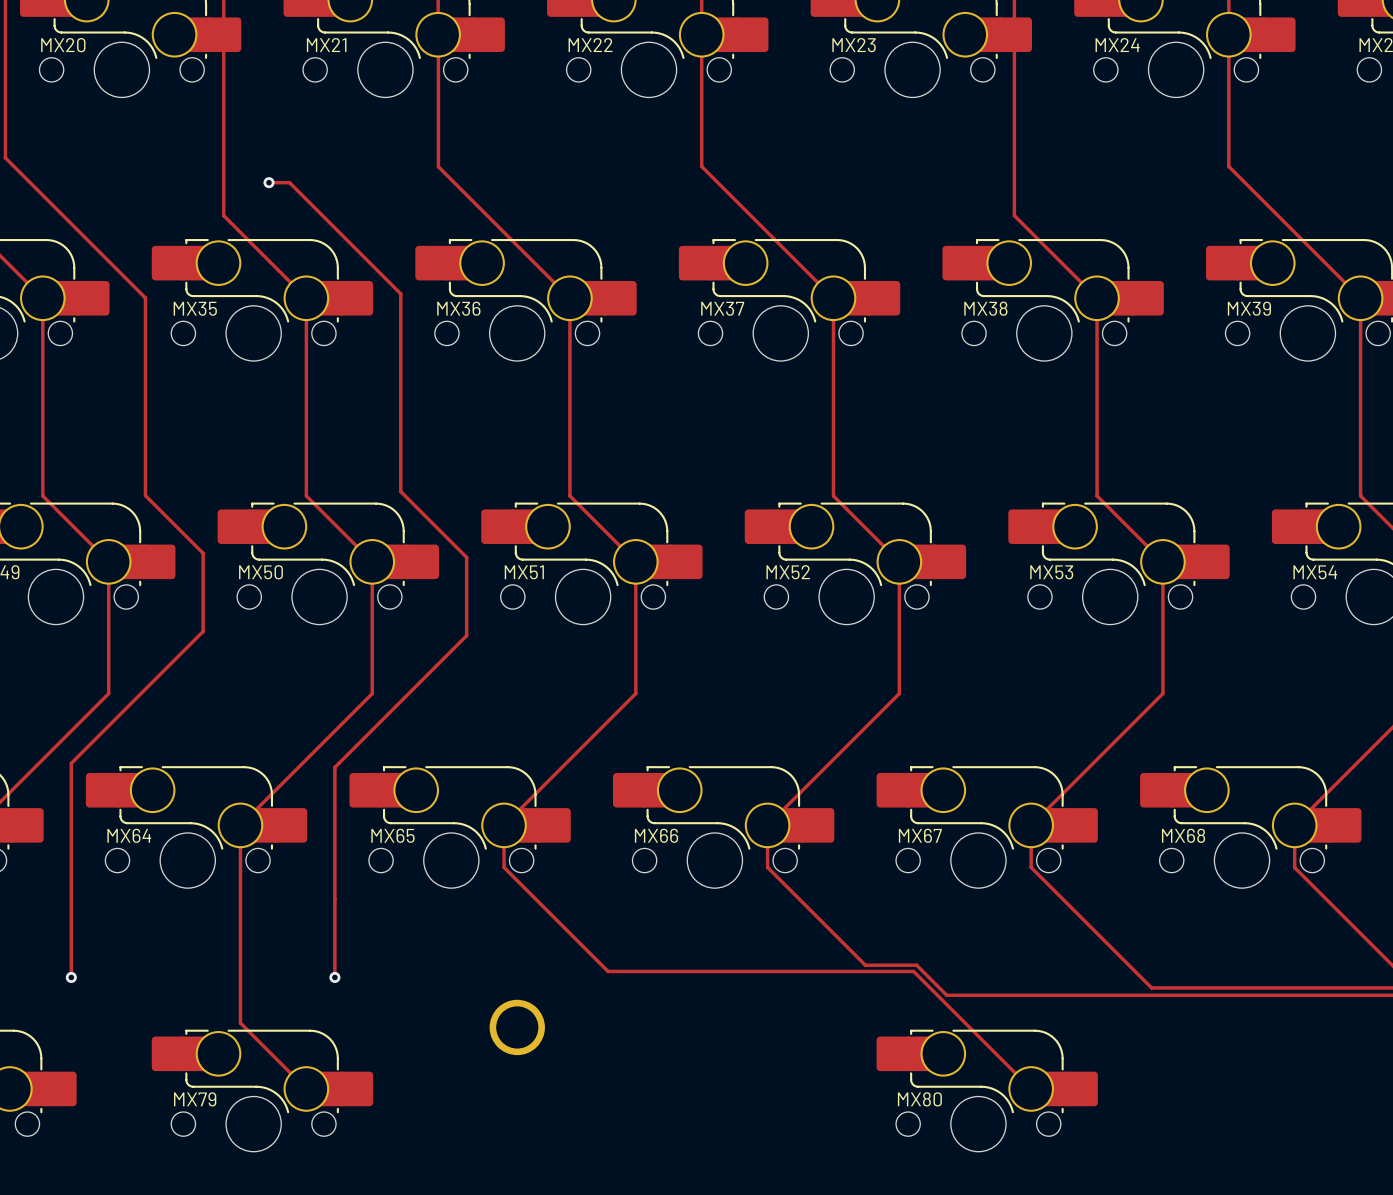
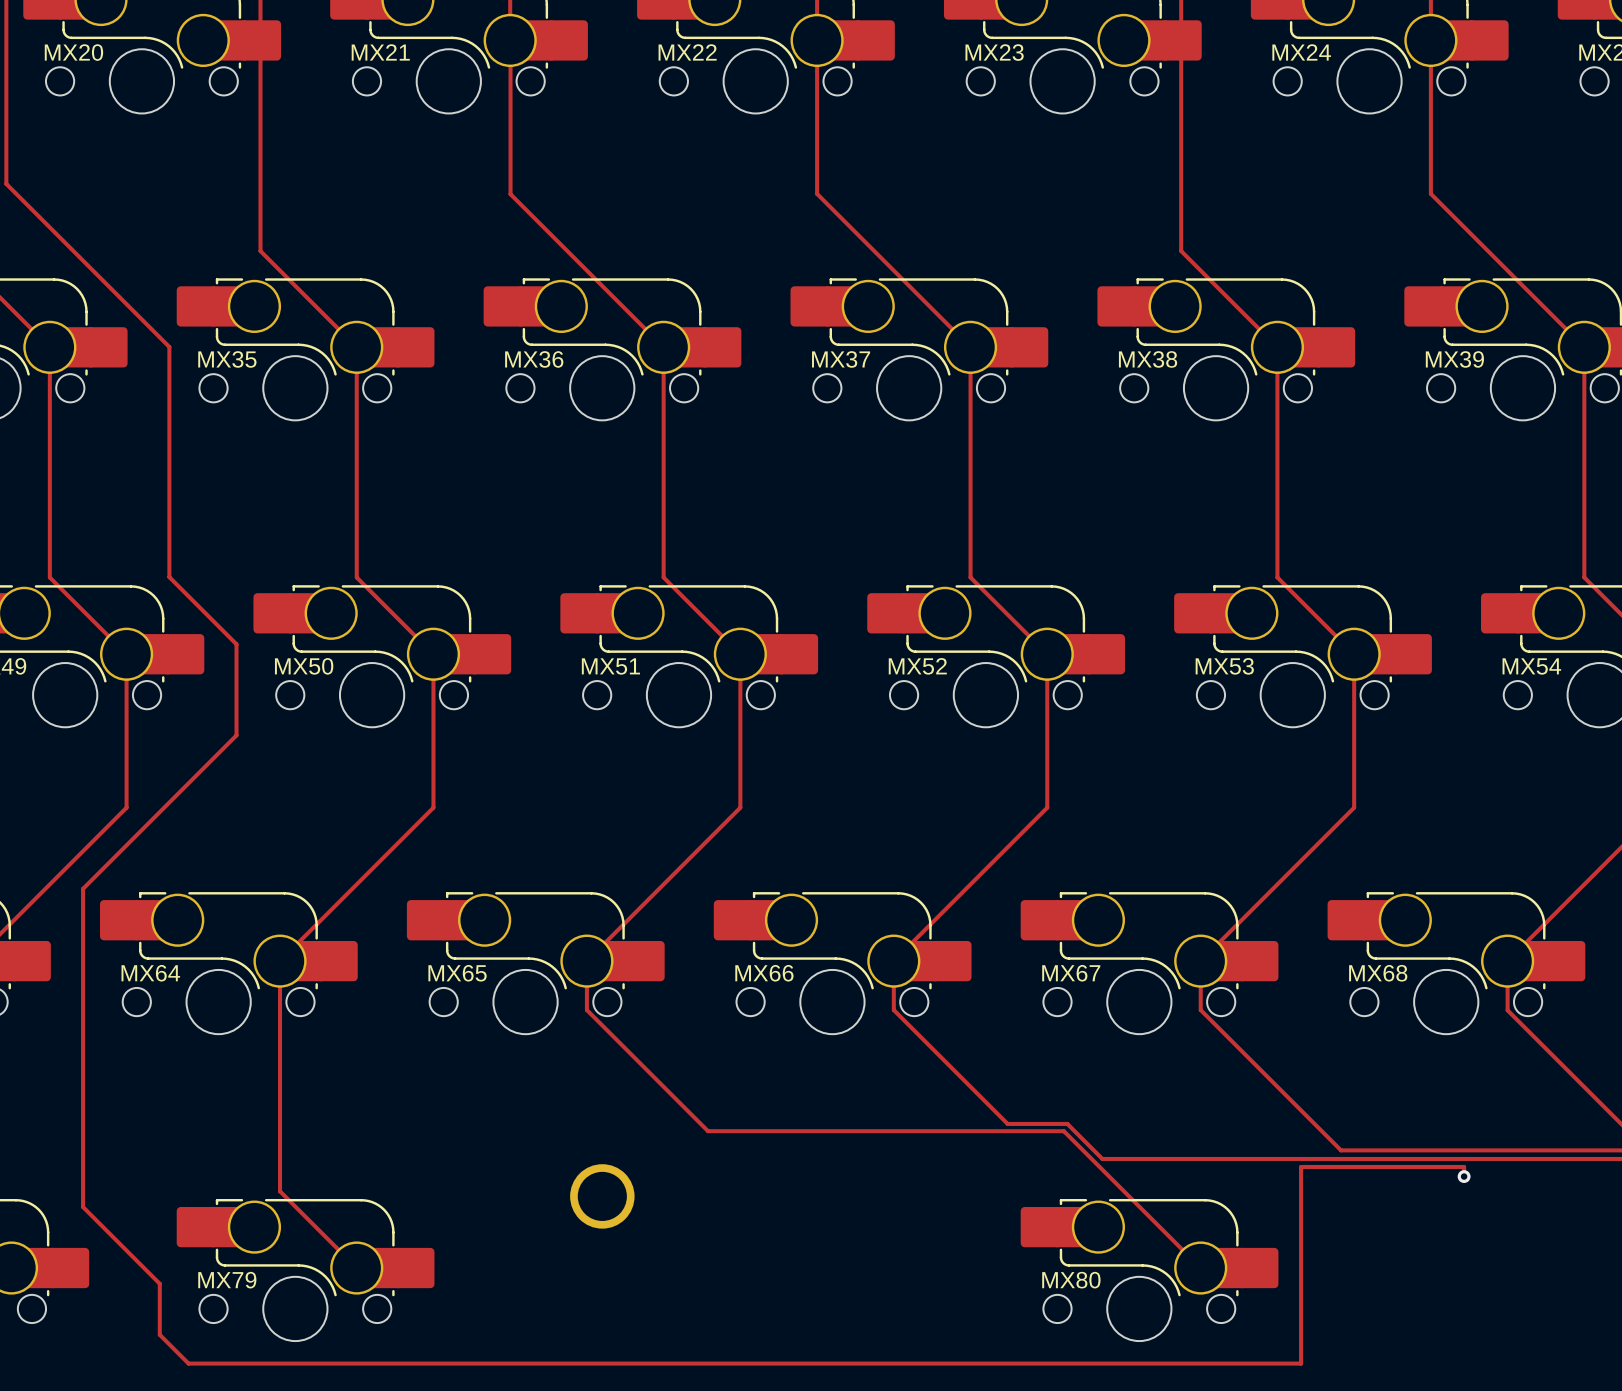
track: (269, 182) (289, 182) (400, 293) (400, 491) (466, 557) (466, 635) (334, 767) (334, 977) -> none
via: (269, 182) -> none
track: none -> (83, 1138) (83, 1207) (159, 1283) (159, 1334) (188, 1363) (1301, 1363) (1301, 1166) (1464, 1166) (1464, 1176)
via: (71, 977) -> none
via: (334, 977) -> none
via: none -> (1464, 1176)

